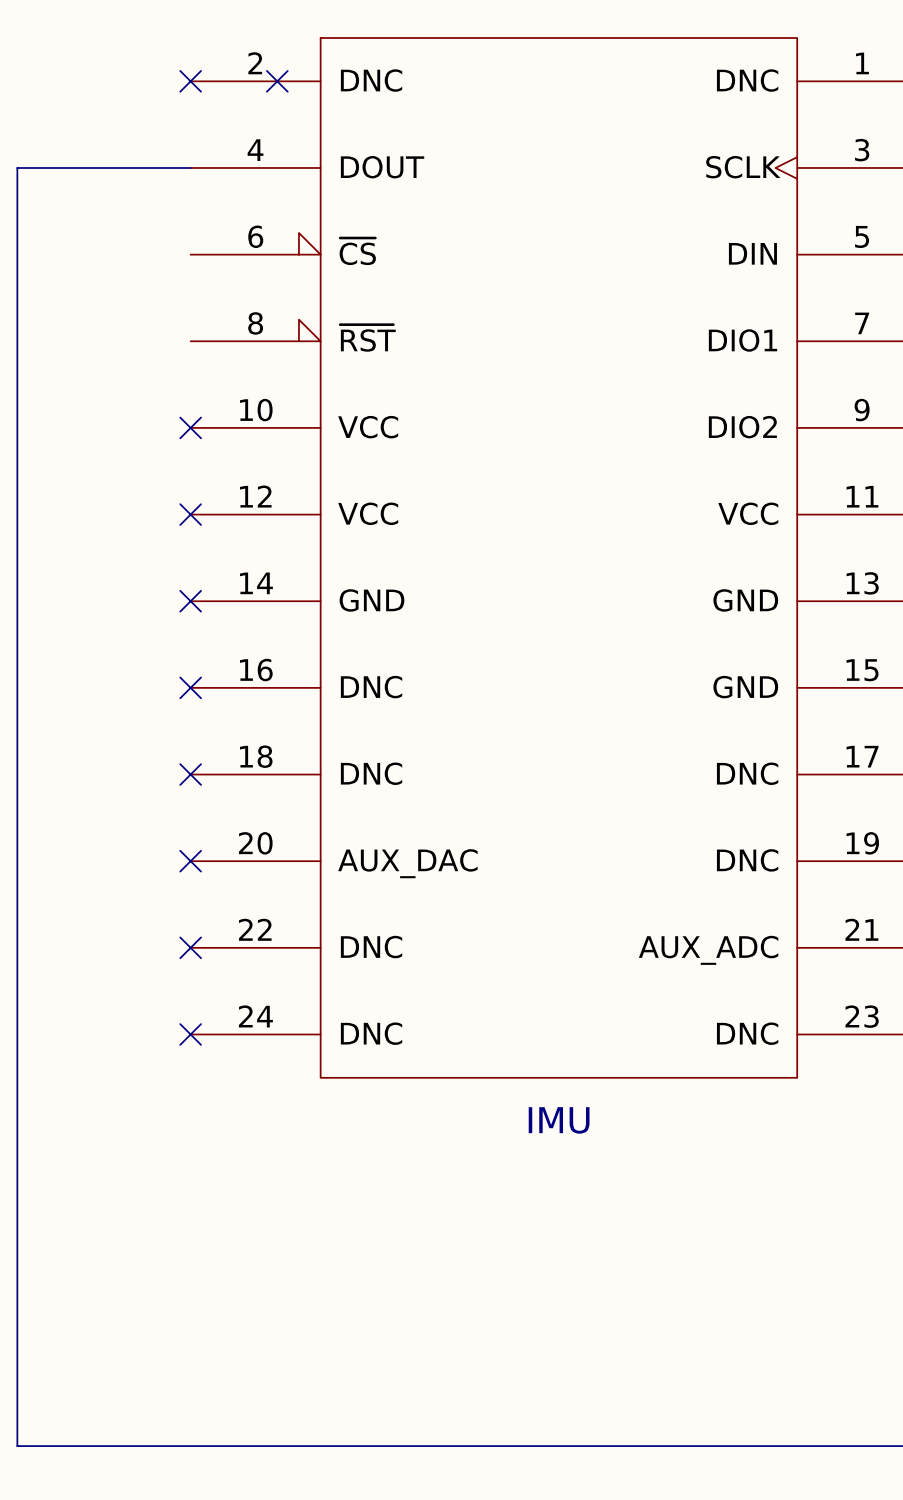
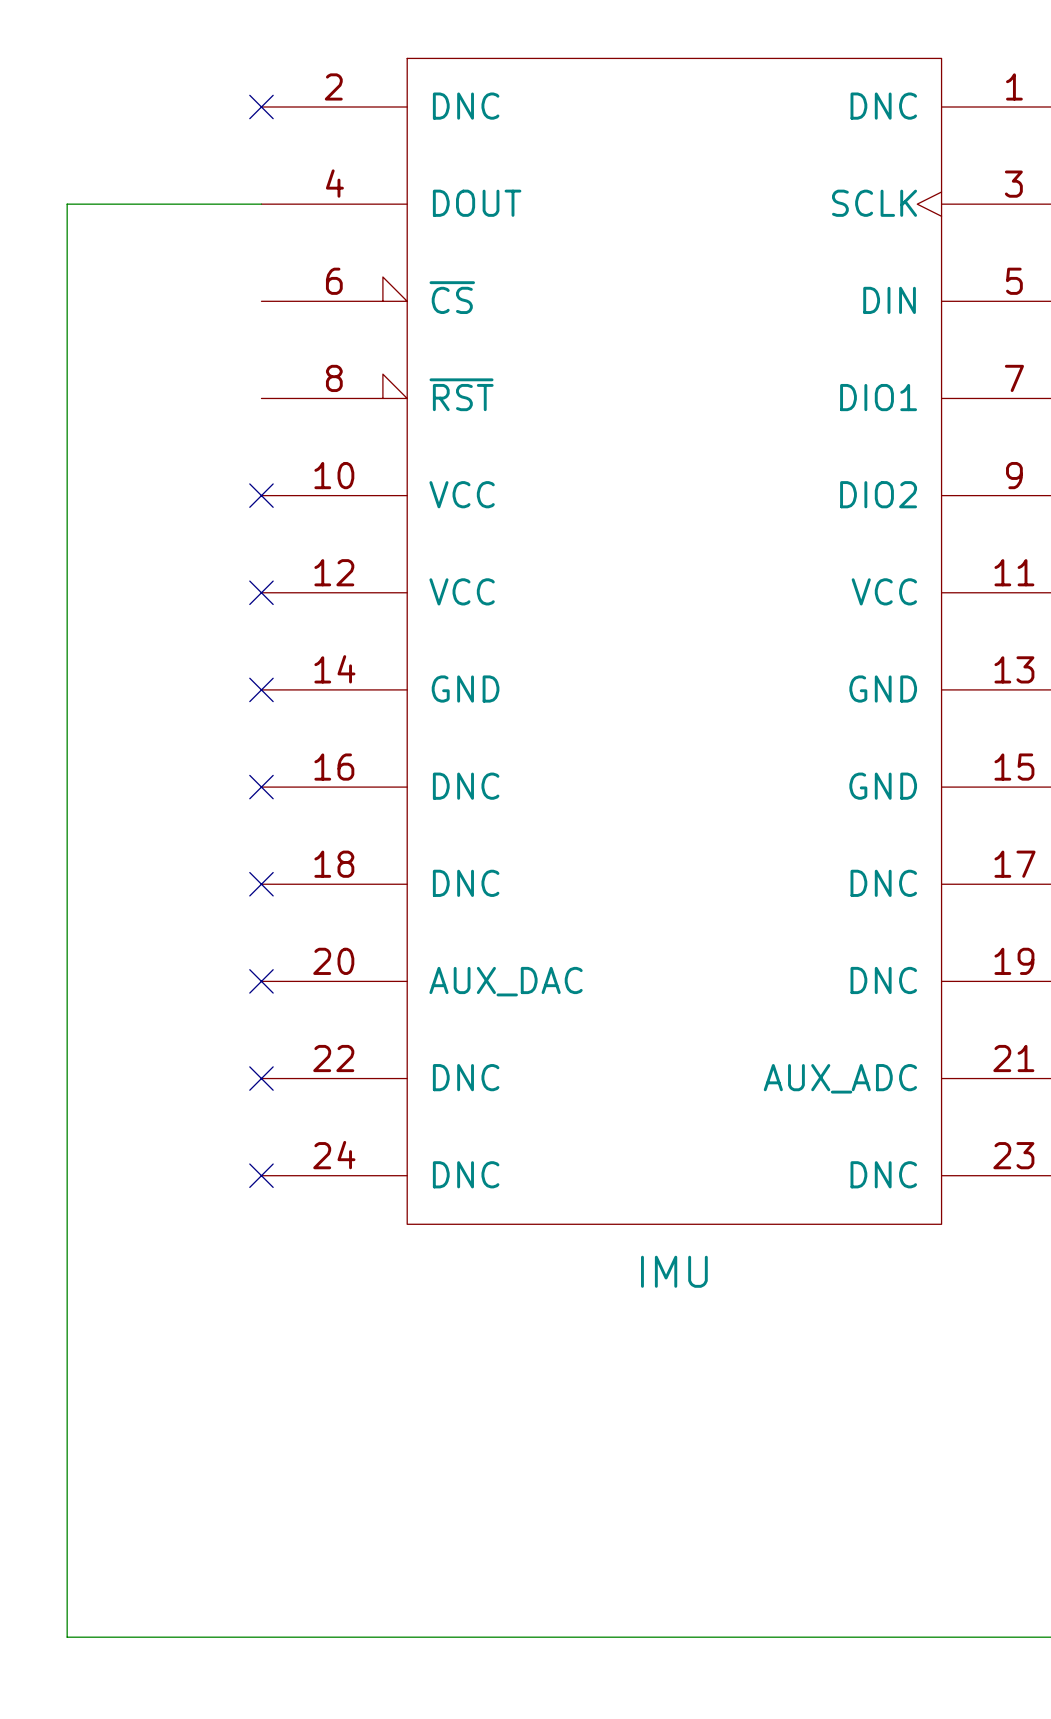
no-connect mark: (277, 81) -> none

